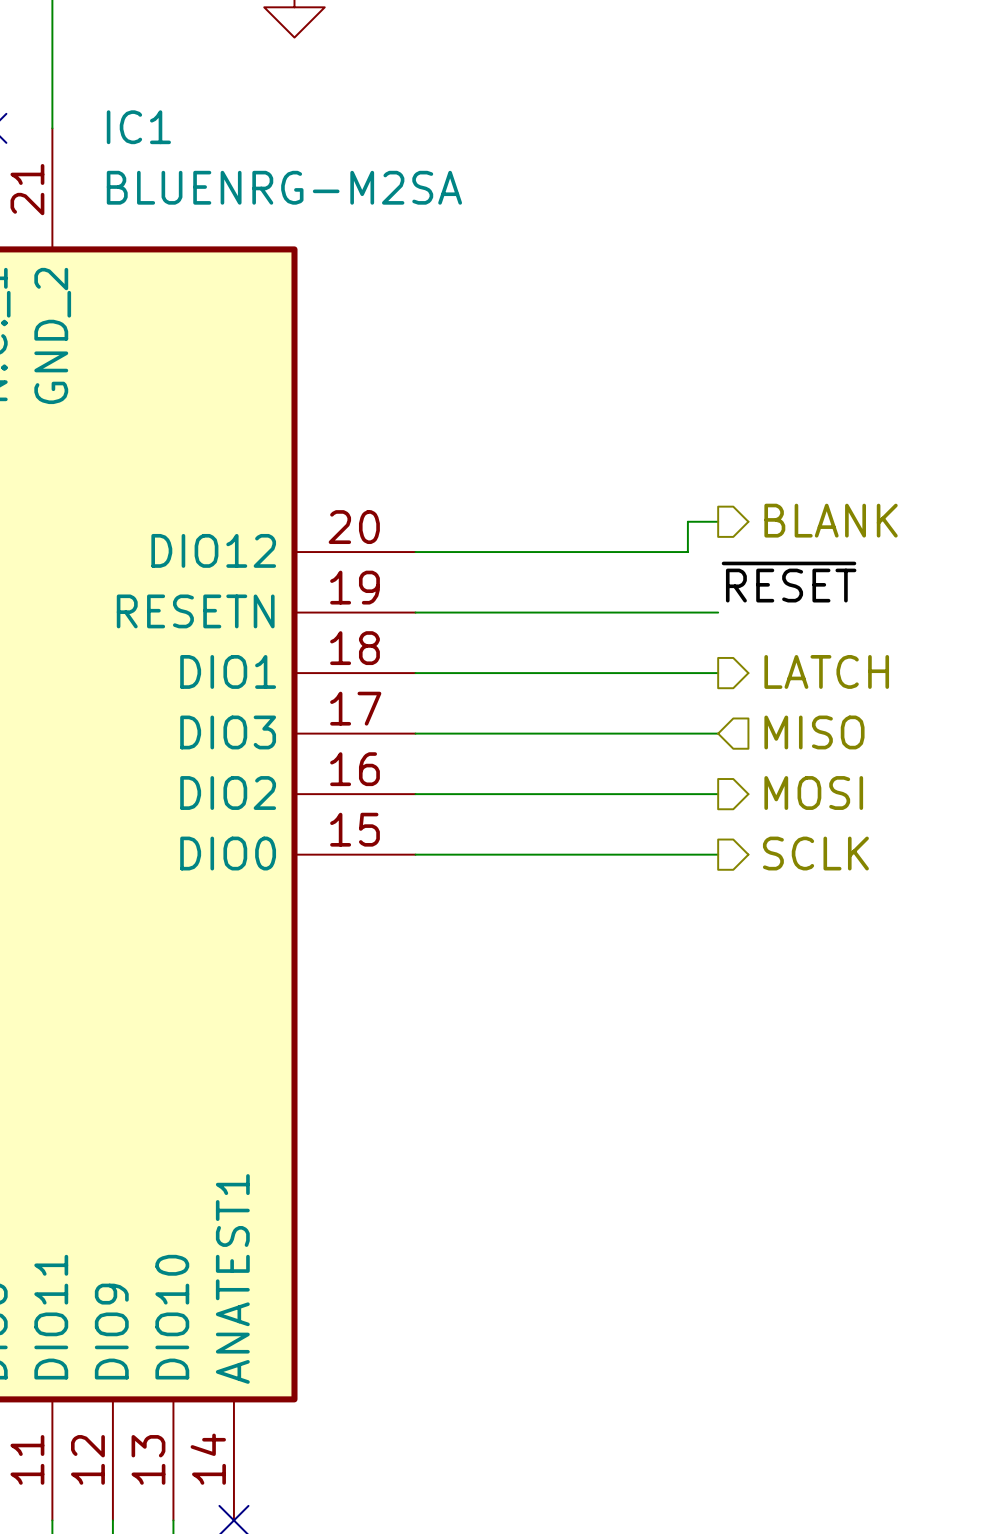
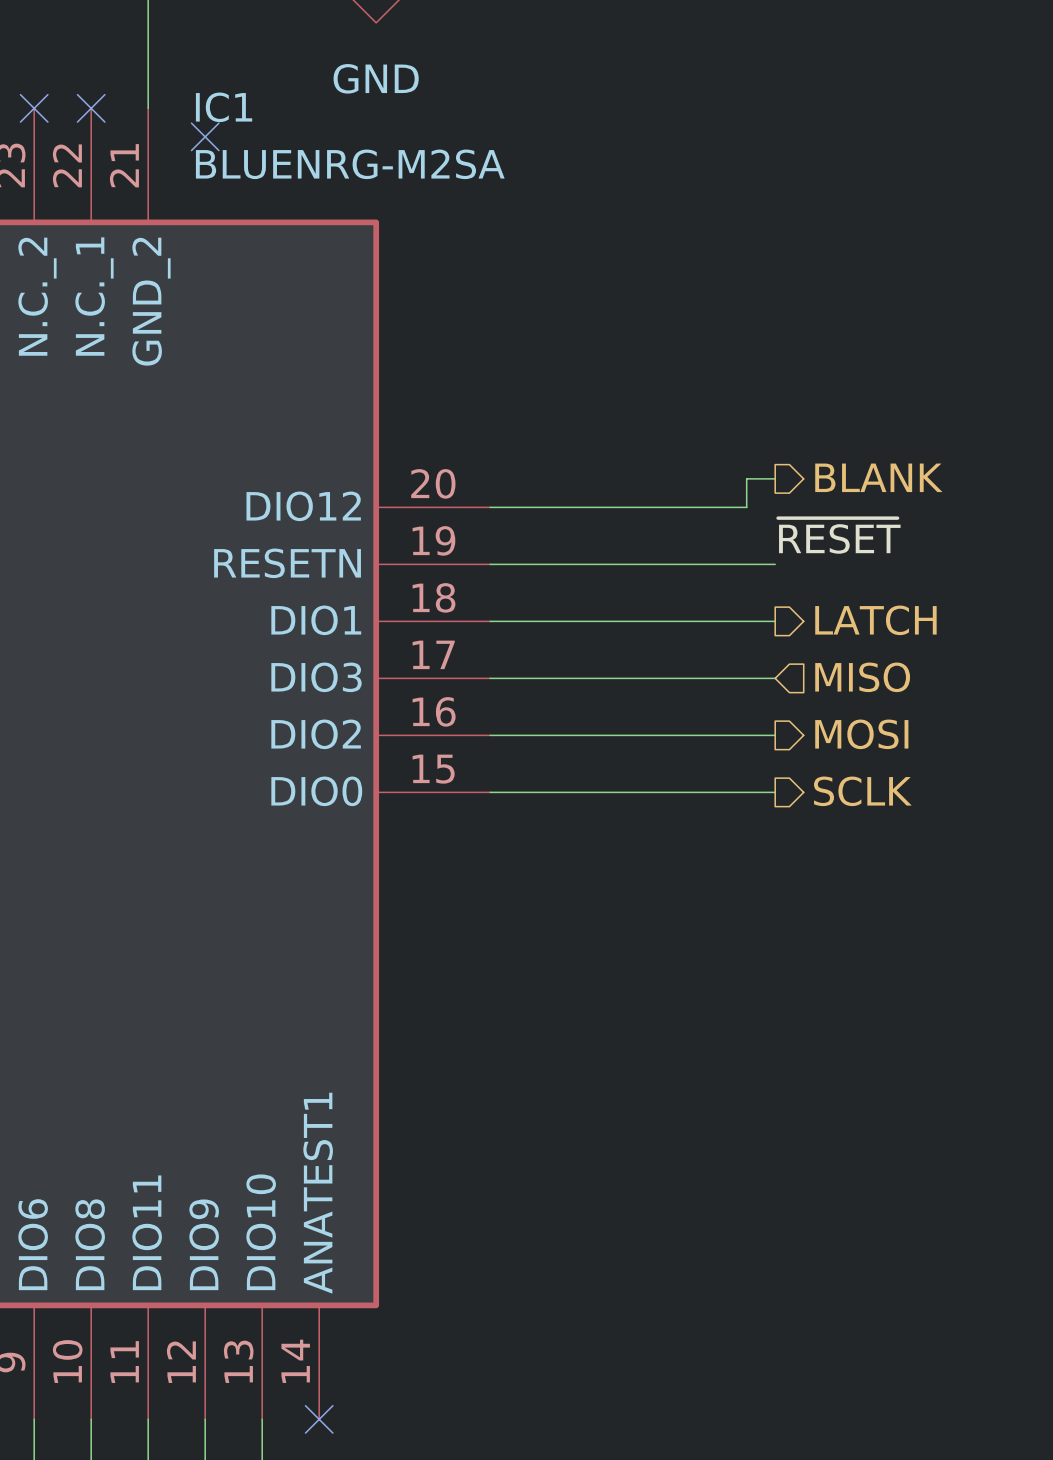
power symbol text: none -> GND (376, 78)
no-connect mark: none -> (205, 136)

